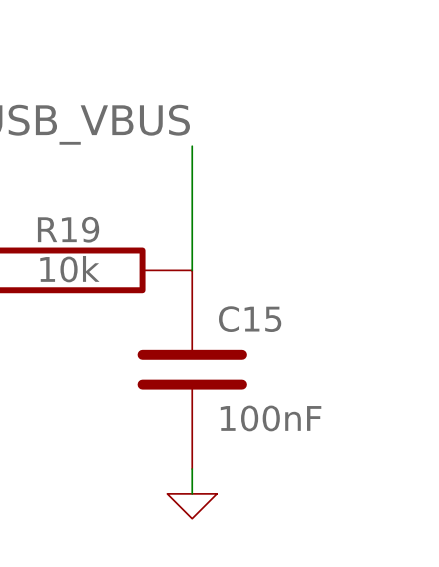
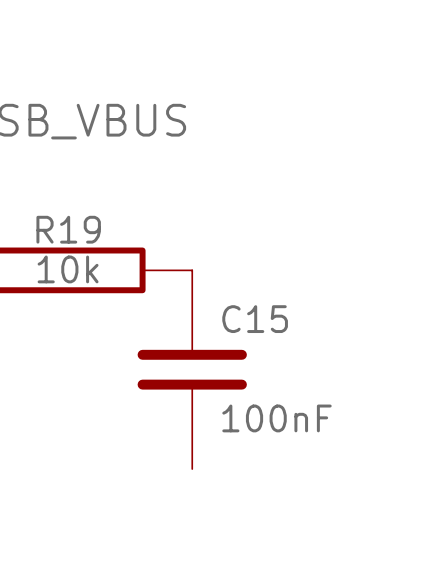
wire: (192, 146) (192, 270) -> none
wire: (192, 469) (192, 493) -> none
power symbol: (192, 506) -> none

